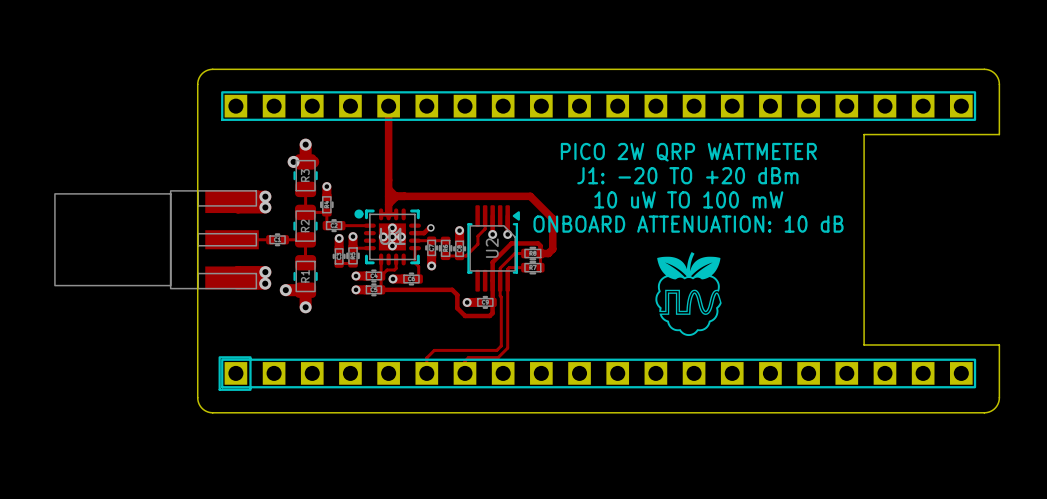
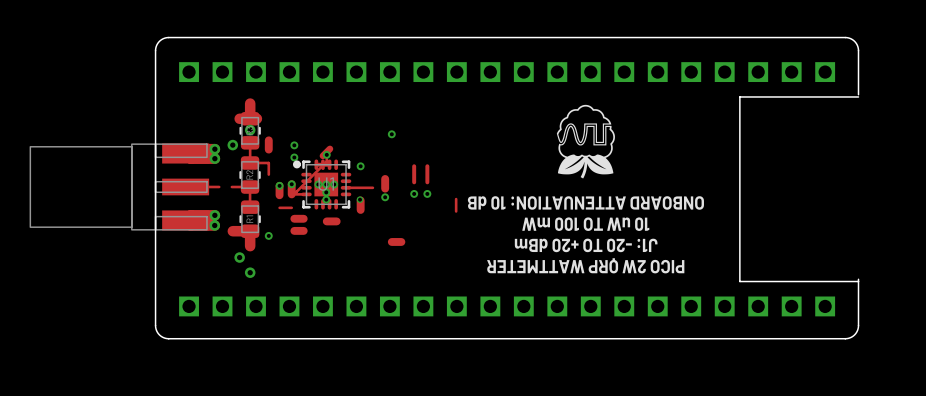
track: (388, 106) (388, 214) -> none
via: (305, 144) -> none
drawing: none -> [556, 104, 615, 179]
text rotation: 0° (688, 152) -> 180° (585, 265)
via: (293, 161) -> none
via: none -> (250, 130)
text rotation: 0° (687, 175) -> 180° (586, 245)
via: none -> (391, 134)
track: (388, 180) (388, 189) (395, 196) (530, 196) (552, 218) (552, 249) (548, 253) (540, 253) (540, 245) (538, 243) (511, 243) (492, 262) (492, 313) (489, 315) (465, 315) (457, 308) (457, 294) (452, 289) (381, 289) (381, 259) -> none
via: (326, 186) -> none
via: none -> (232, 145)
via: none -> (294, 145)
text rotation: 0° (688, 199) -> 180° (585, 224)
track: none -> (326, 154) (326, 161) (296, 192) (291, 192)
via: none -> (326, 154)
part: (326, 204) -> none
via: none -> (294, 157)
via: none -> (360, 166)
track: (485, 216) (485, 228) (477, 236) (477, 244) (466, 256) (445, 256) -> none
text rotation: 0° (688, 224) -> 180° (585, 202)
part: (334, 225) -> none
track: (341, 225) (369, 225) -> none
via: (392, 227) -> none
track: (430, 227) (424, 233) (414, 233) -> none
via position: (430, 227) -> (360, 199)
via: (459, 230) -> none
via: (492, 234) -> none
via: (507, 234) -> none
part: (277, 239) -> none
part side: top (609, 241) -> bottom (518, 189)
part: (431, 247) -> none
via: none -> (414, 193)
via: none -> (427, 193)
track: (414, 248) (414, 262) (418, 266) (418, 279) -> none
part: (445, 248) -> none
part: (459, 248) -> none
U2: (493, 248) -> none
via: none -> (385, 197)
drawing: [655, 252, 722, 337] -> none
track: (525, 253) (514, 253) (500, 268) (501, 345) (496, 350) (434, 350) (426, 357) (426, 373) -> none
part: (532, 253) -> none
via: none -> (326, 199)
part: (353, 255) -> none
part: (339, 256) -> none
track: (396, 259) (396, 268) (387, 269) (381, 275) -> none
via: (431, 265) -> none
track: (525, 267) (507, 269) (507, 348) (498, 357) (468, 357) (464, 361) (464, 373) -> none
part: (532, 267) -> none
via: (356, 276) -> none
part: (373, 276) -> none
via: (392, 279) -> none
part: (411, 279) -> none
via: (356, 289) -> none
part: (373, 289) -> none
via: (285, 290) -> none
via: none -> (268, 235)
via: (467, 302) -> none
part: (485, 302) -> none
via: (305, 307) -> none
via: none -> (239, 257)
via: none -> (250, 272)

